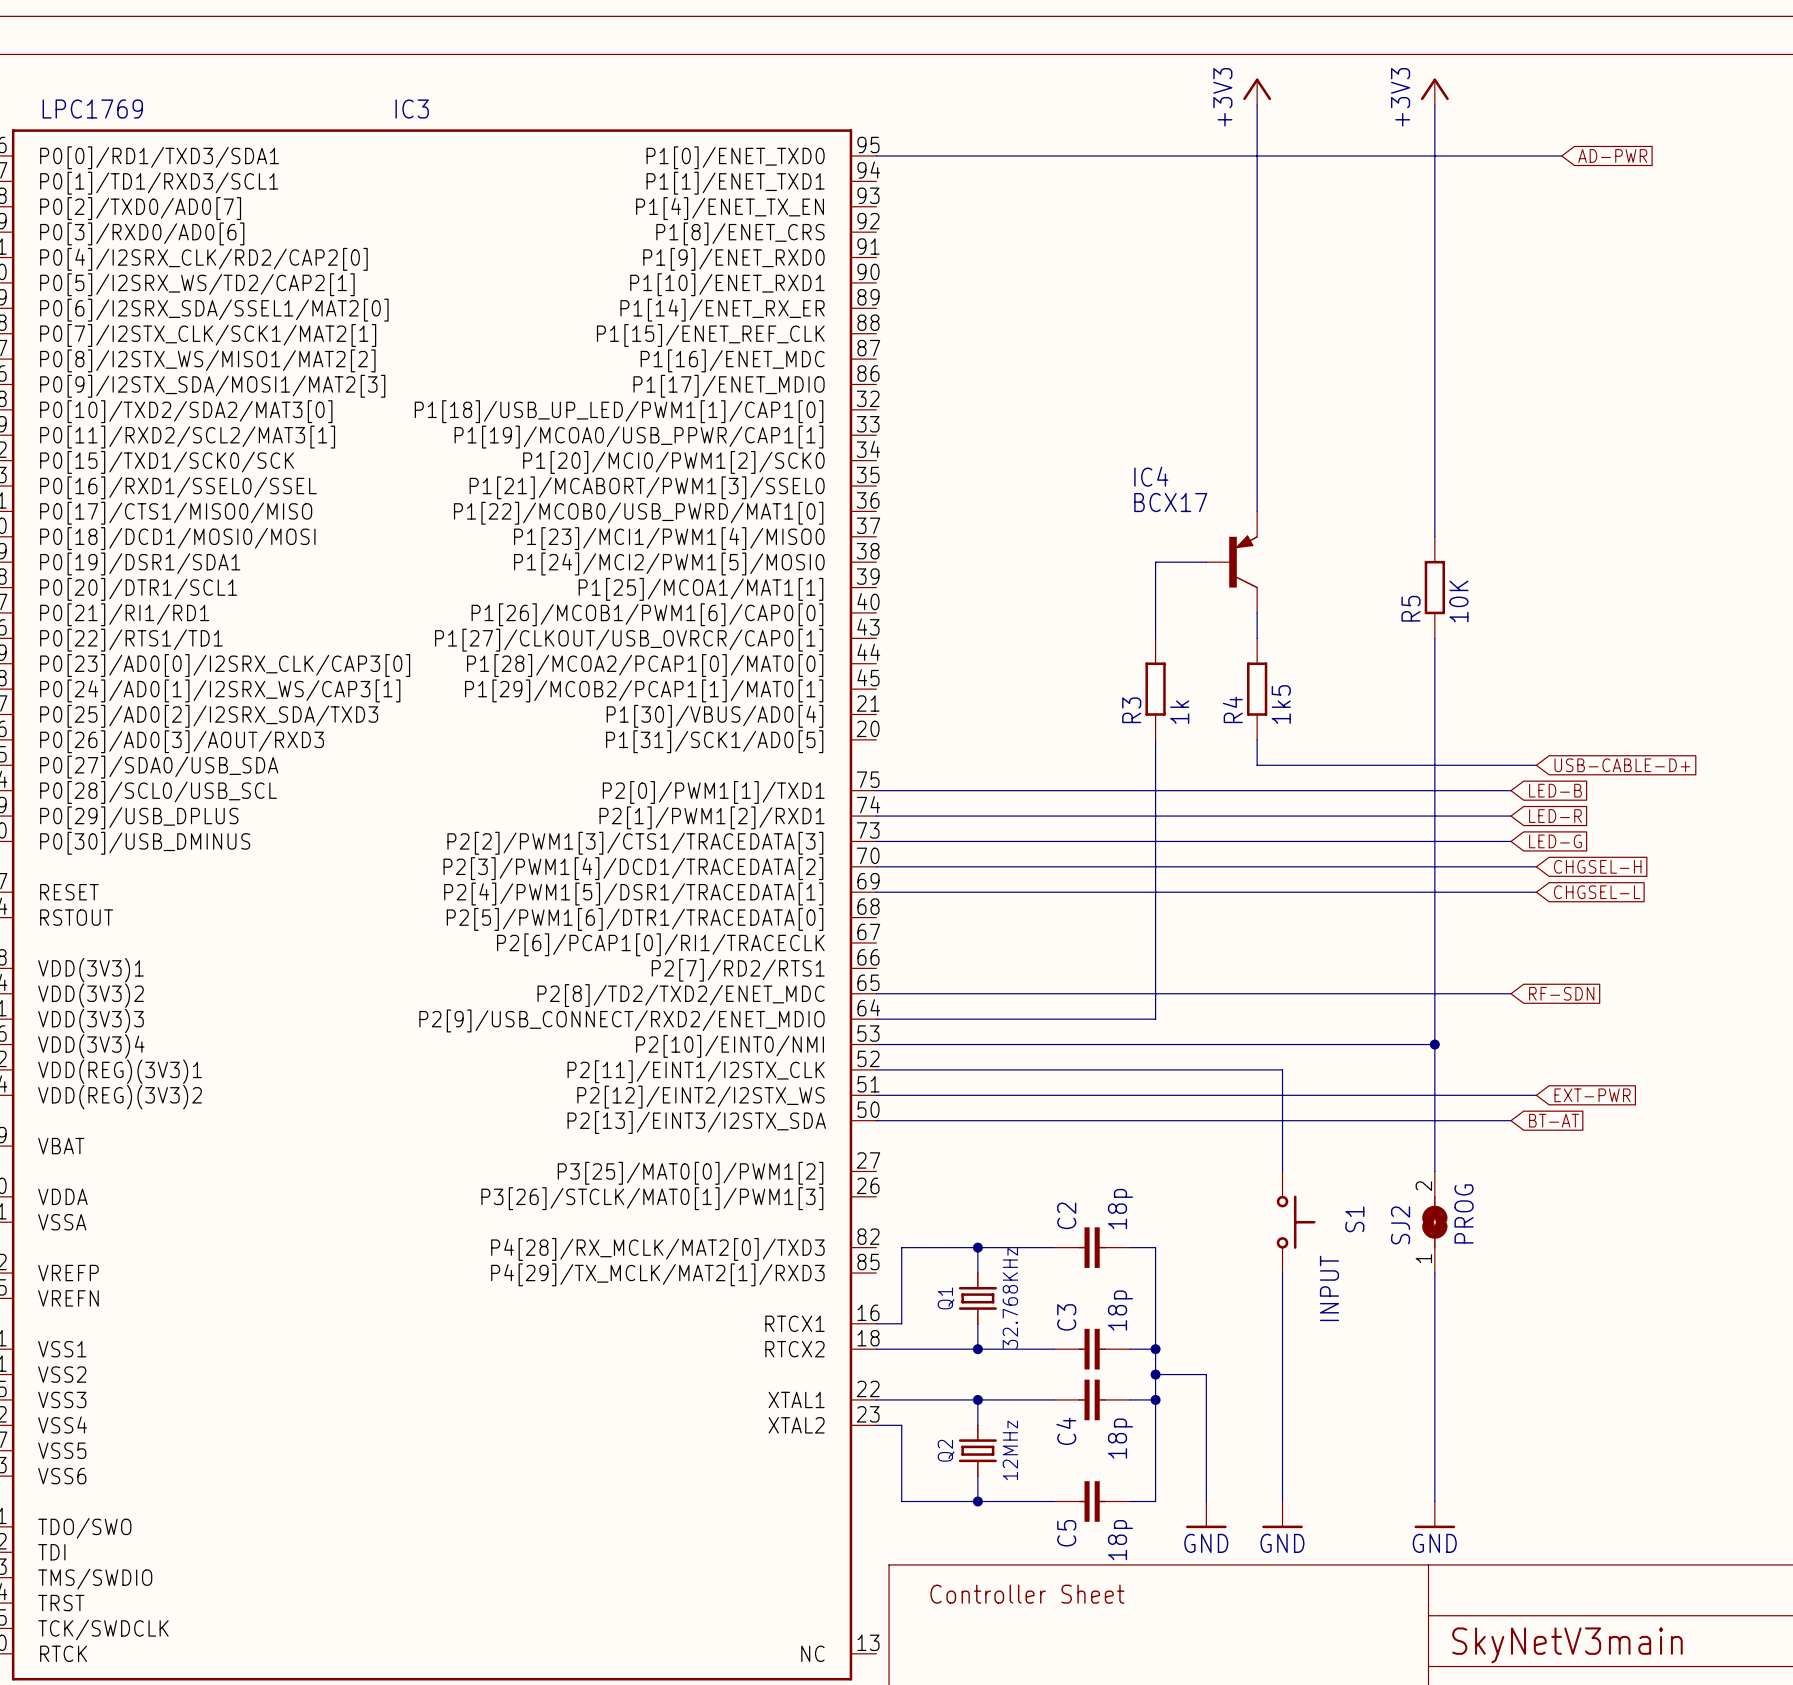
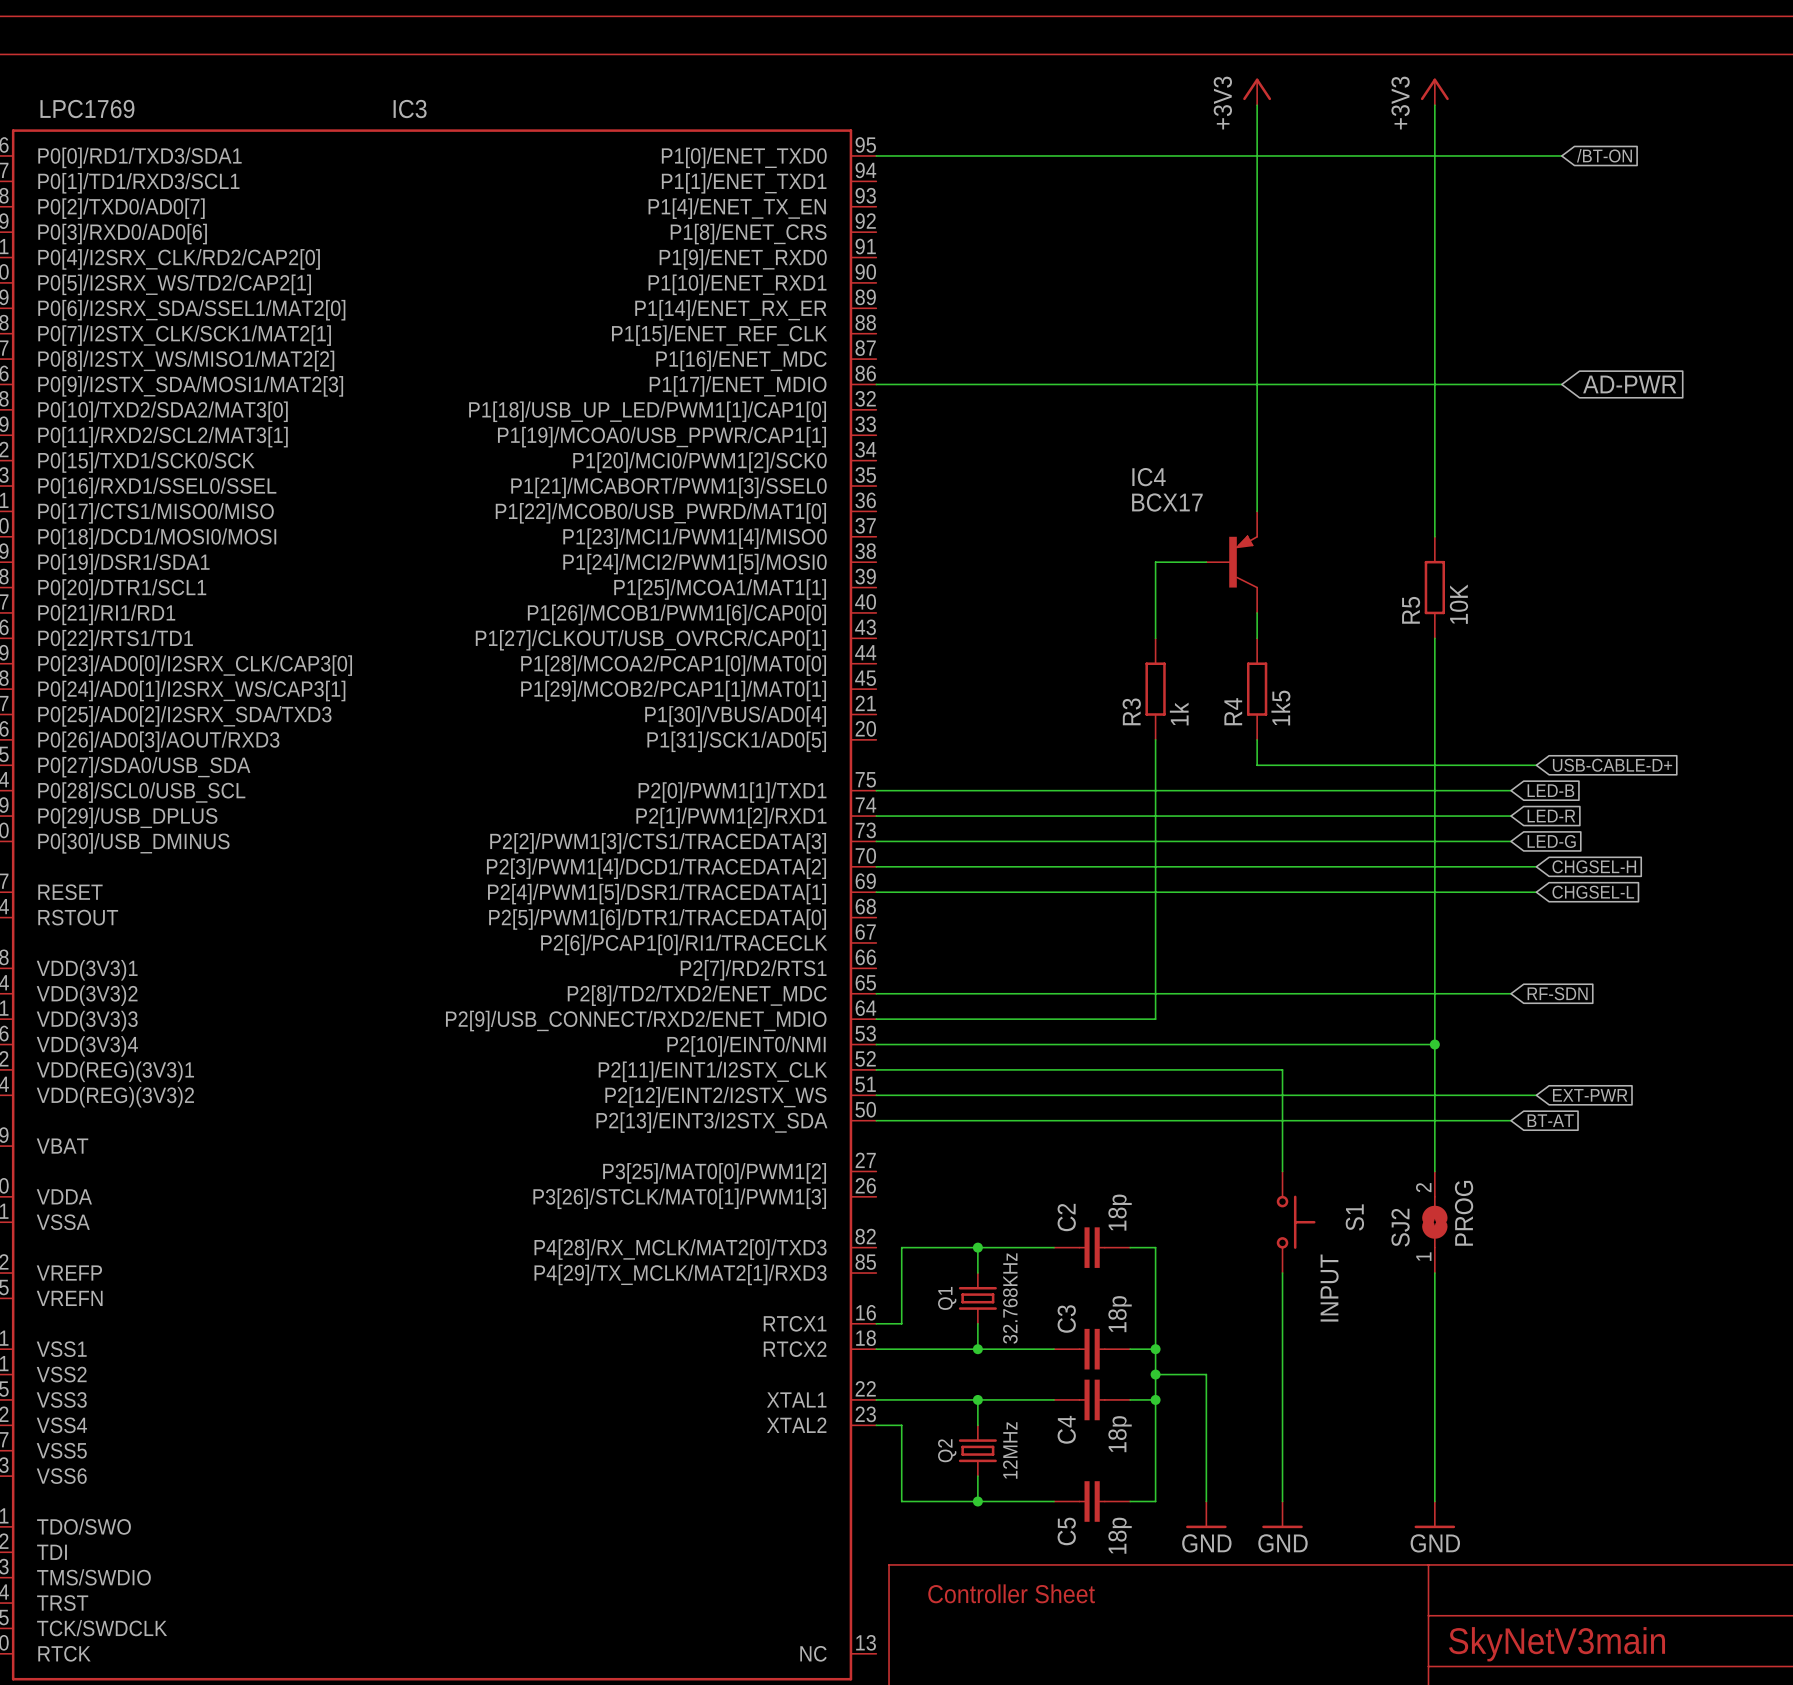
global label: AD-PWR (1612, 155) -> /BT-ON (1604, 155)
wire: none -> (876, 384) (1561, 384)
global label: none -> AD-PWR (1629, 384)

